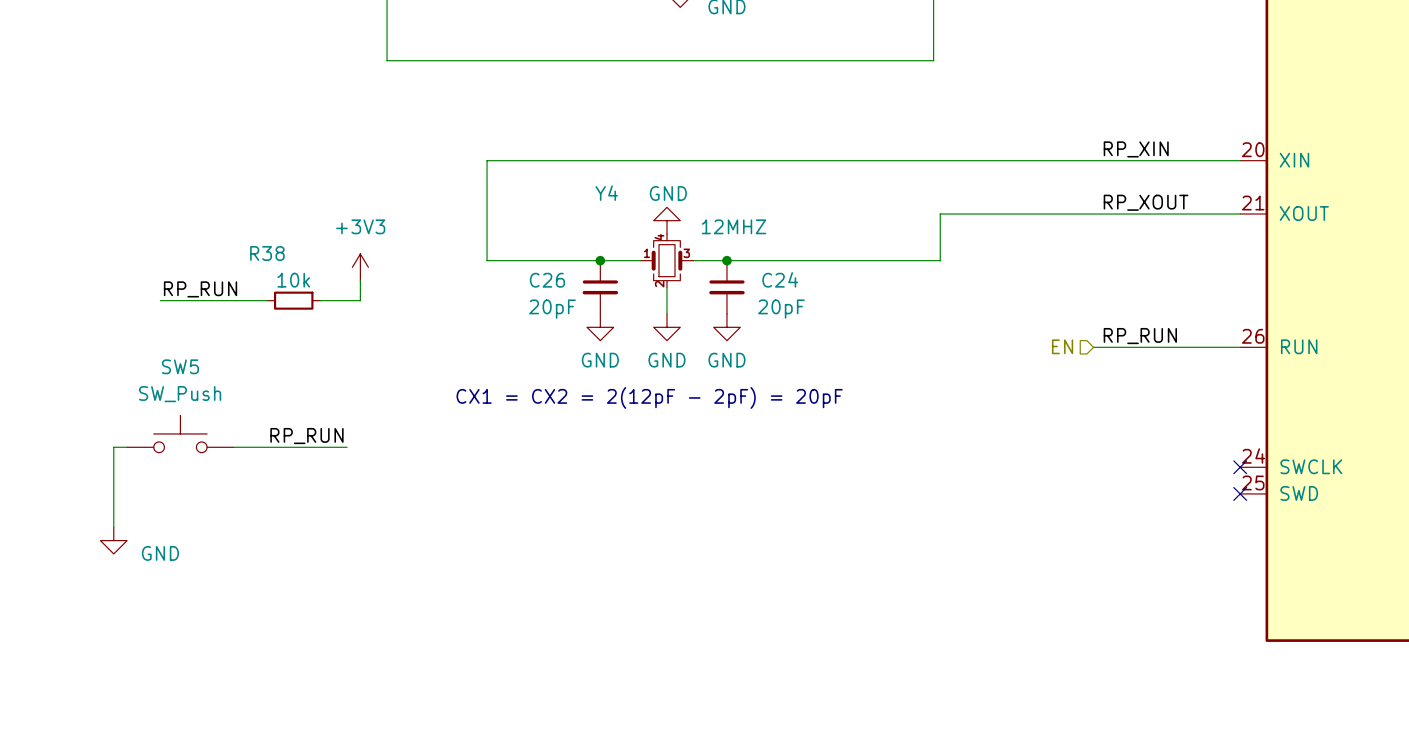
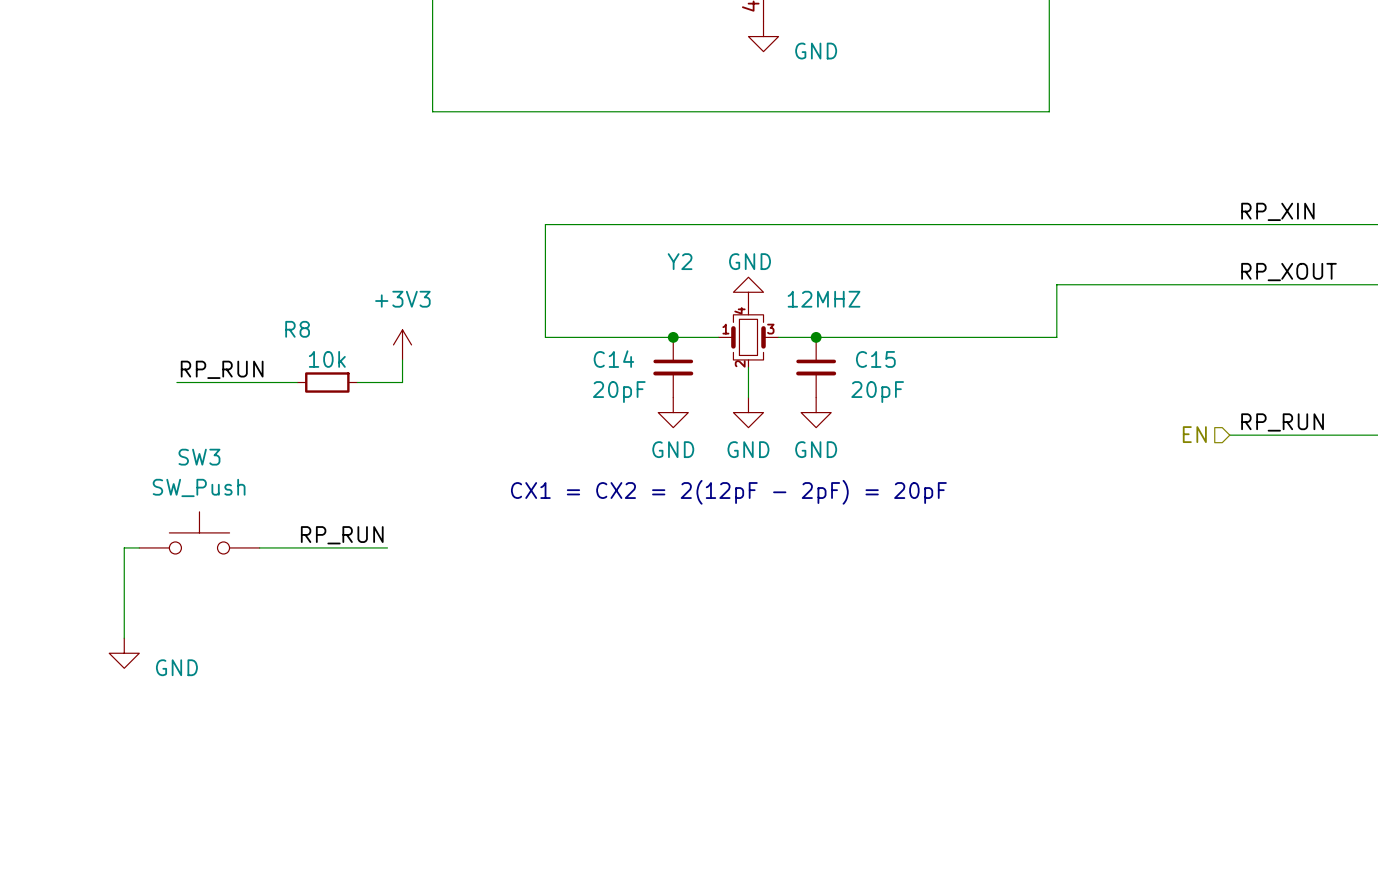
Y4 name: Y4 (606, 193) -> Y2 (680, 261)
R38 name: R38 (267, 253) -> R8 (297, 329)
C24 name: C24 (780, 279) -> C15 (875, 359)
C26 name: C26 (547, 280) -> C14 (613, 359)
SW5 name: SW5 (180, 366) -> SW3 (199, 457)

